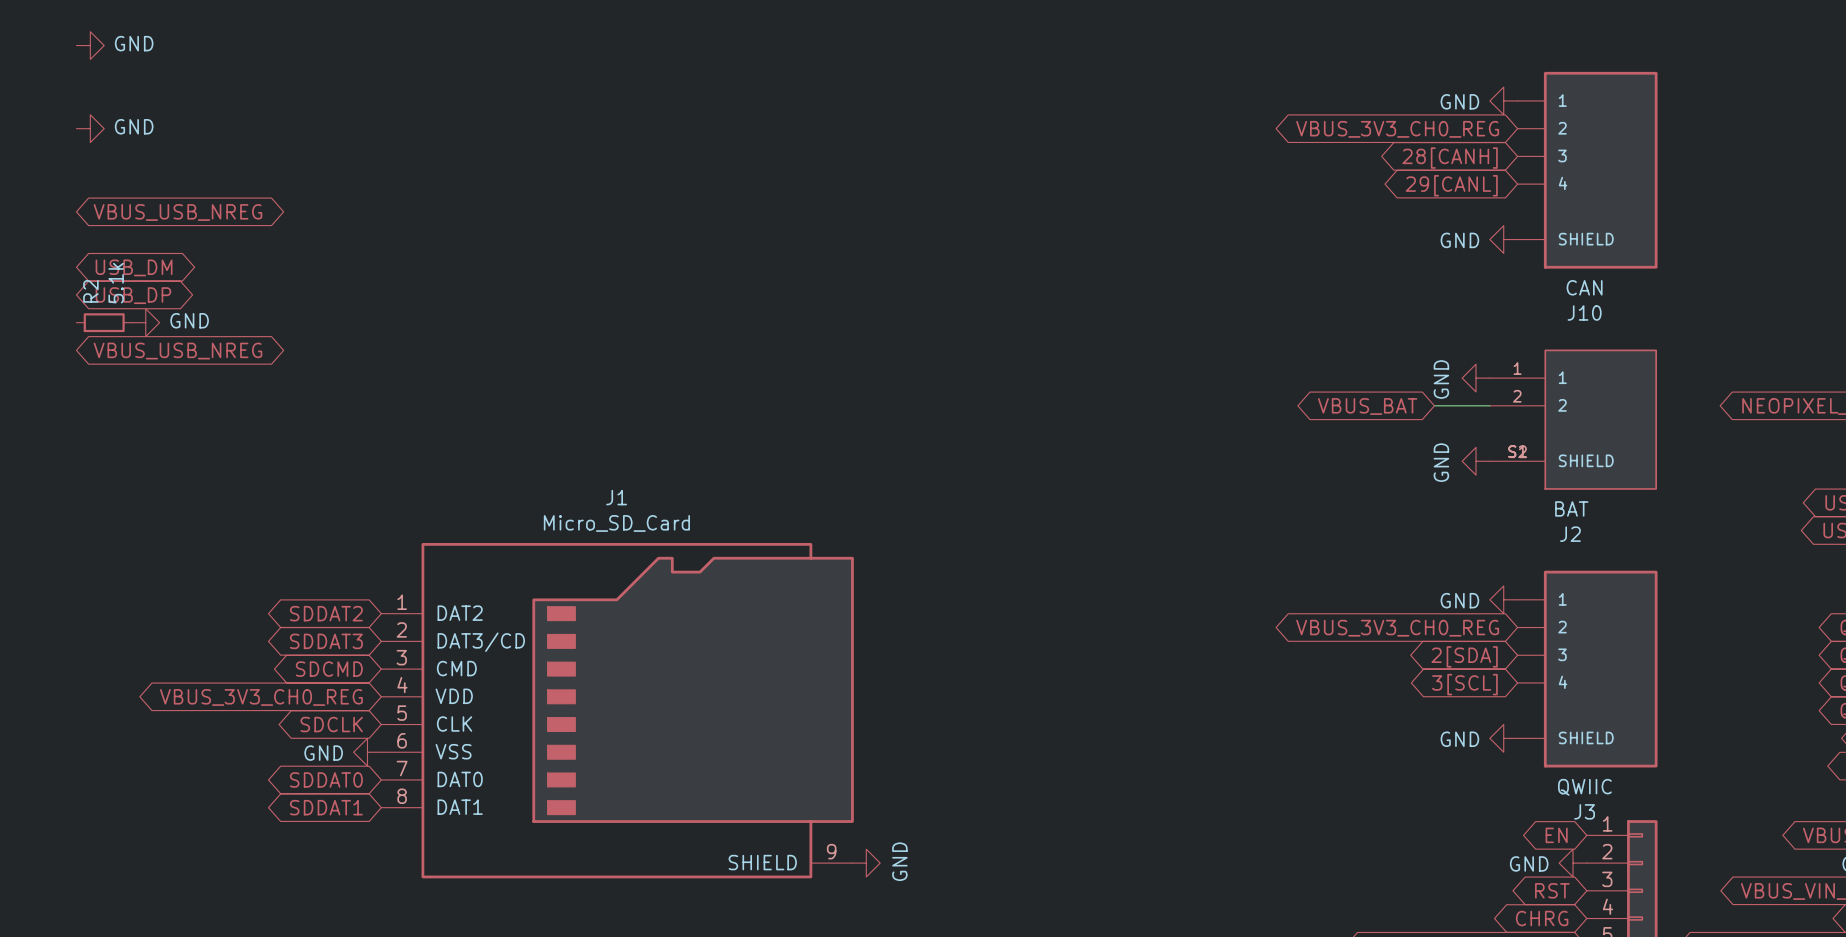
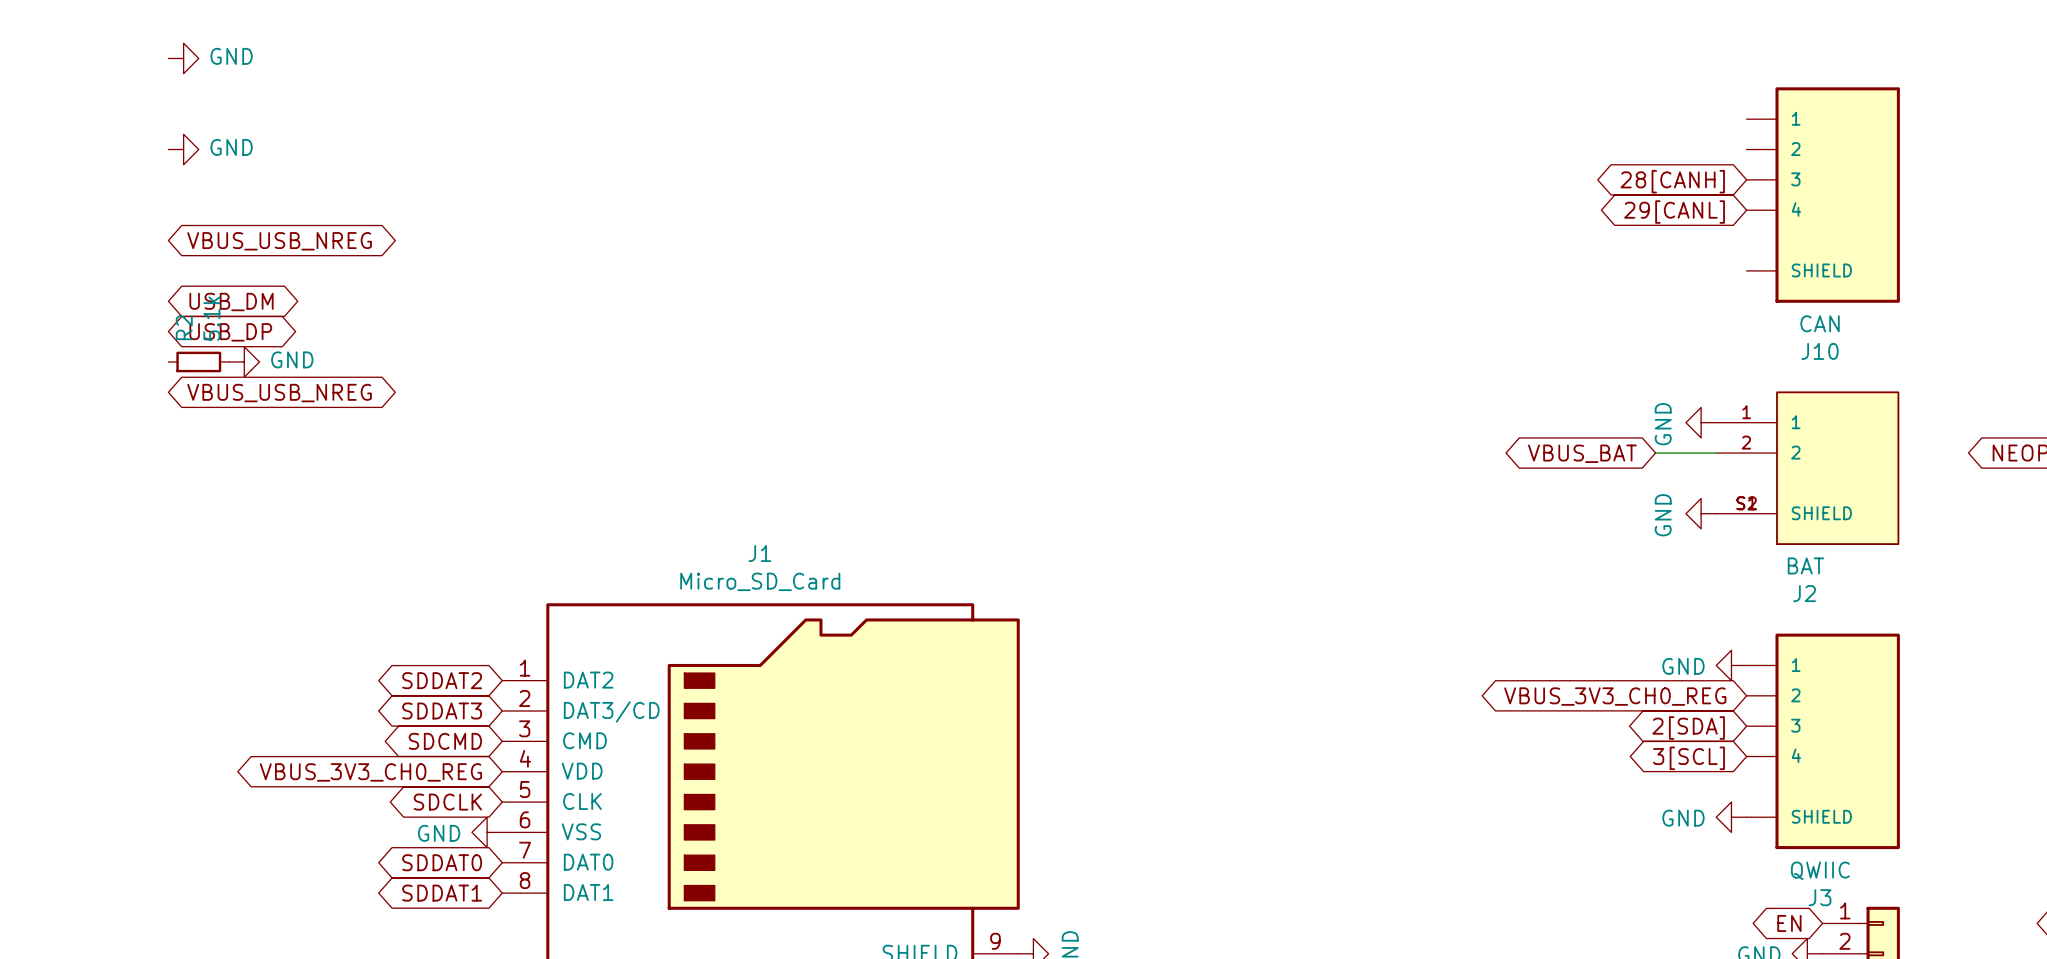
power symbol: GND (1503, 100) -> none
global label: VBUS_3V3_CH0_REG (1397, 129) -> none
power symbol: GND (1503, 239) -> none

